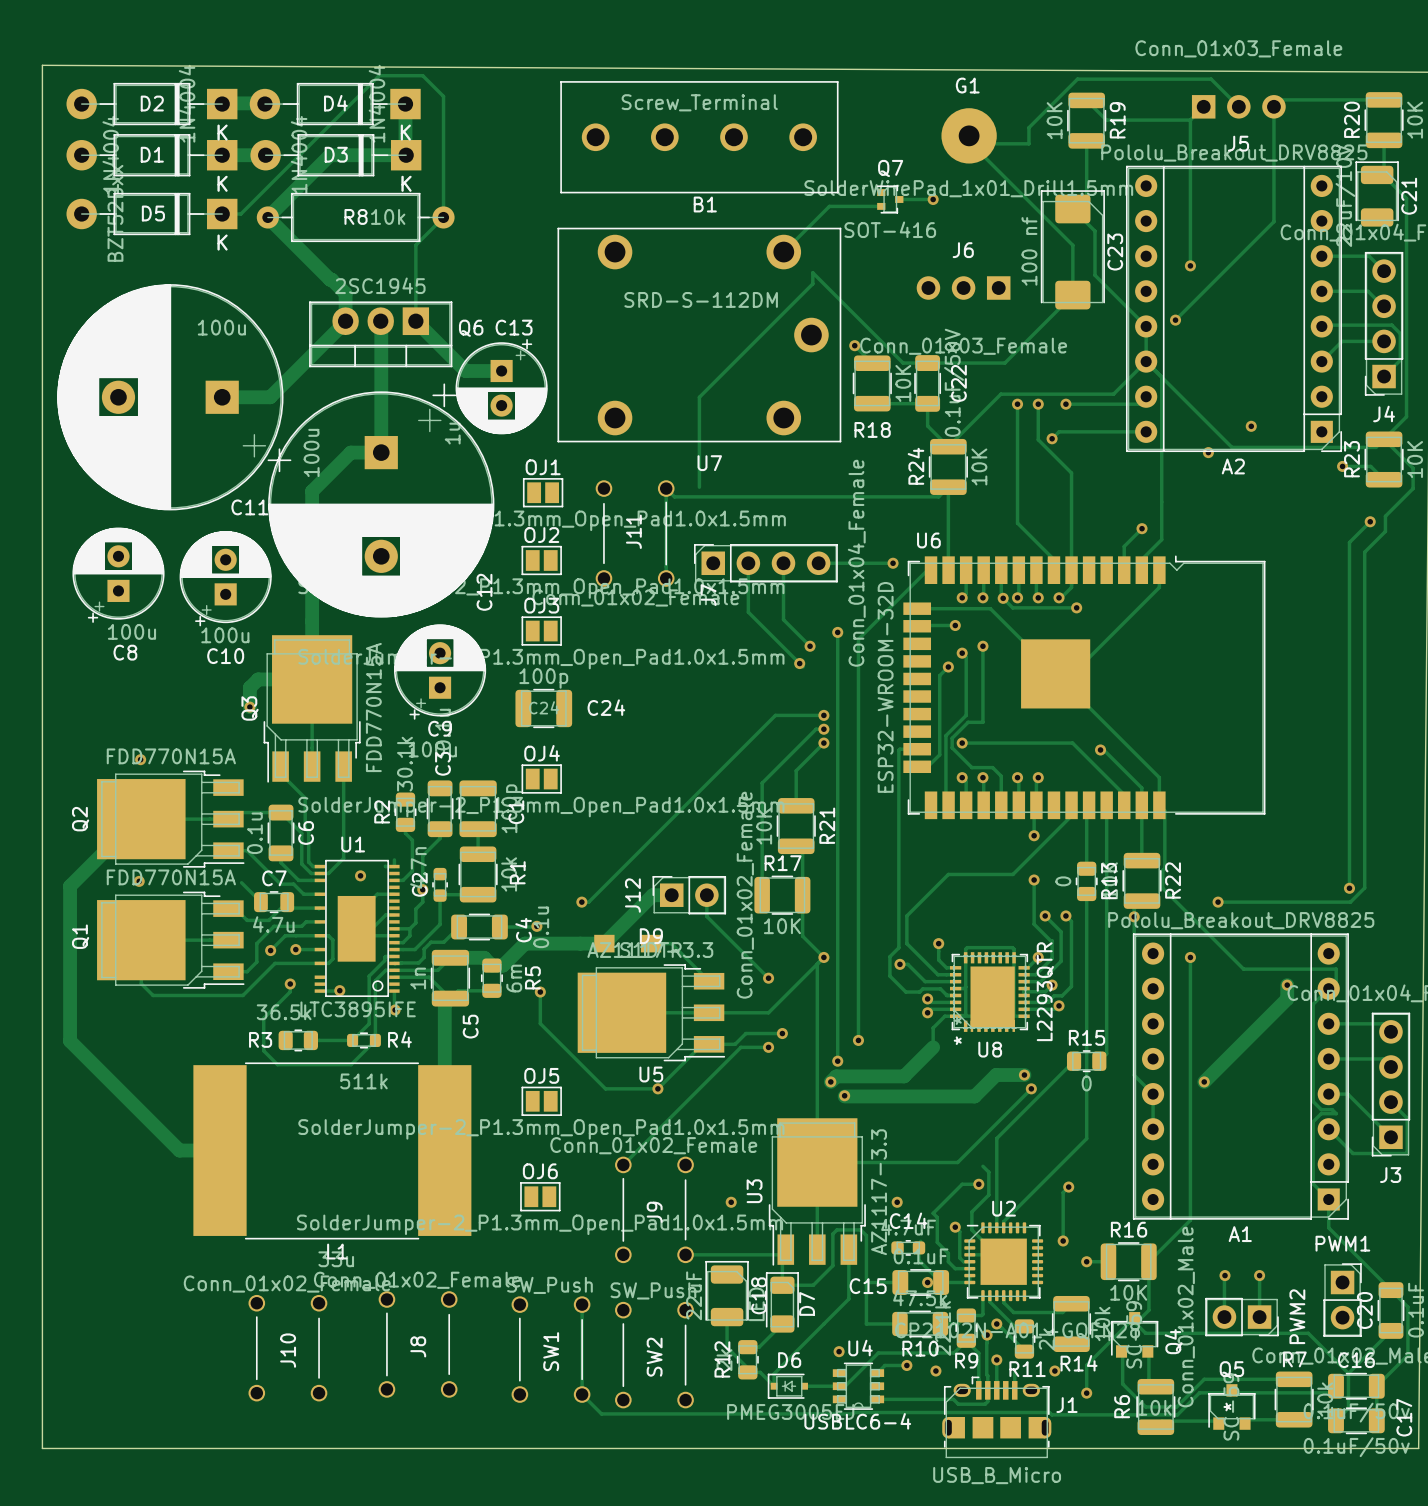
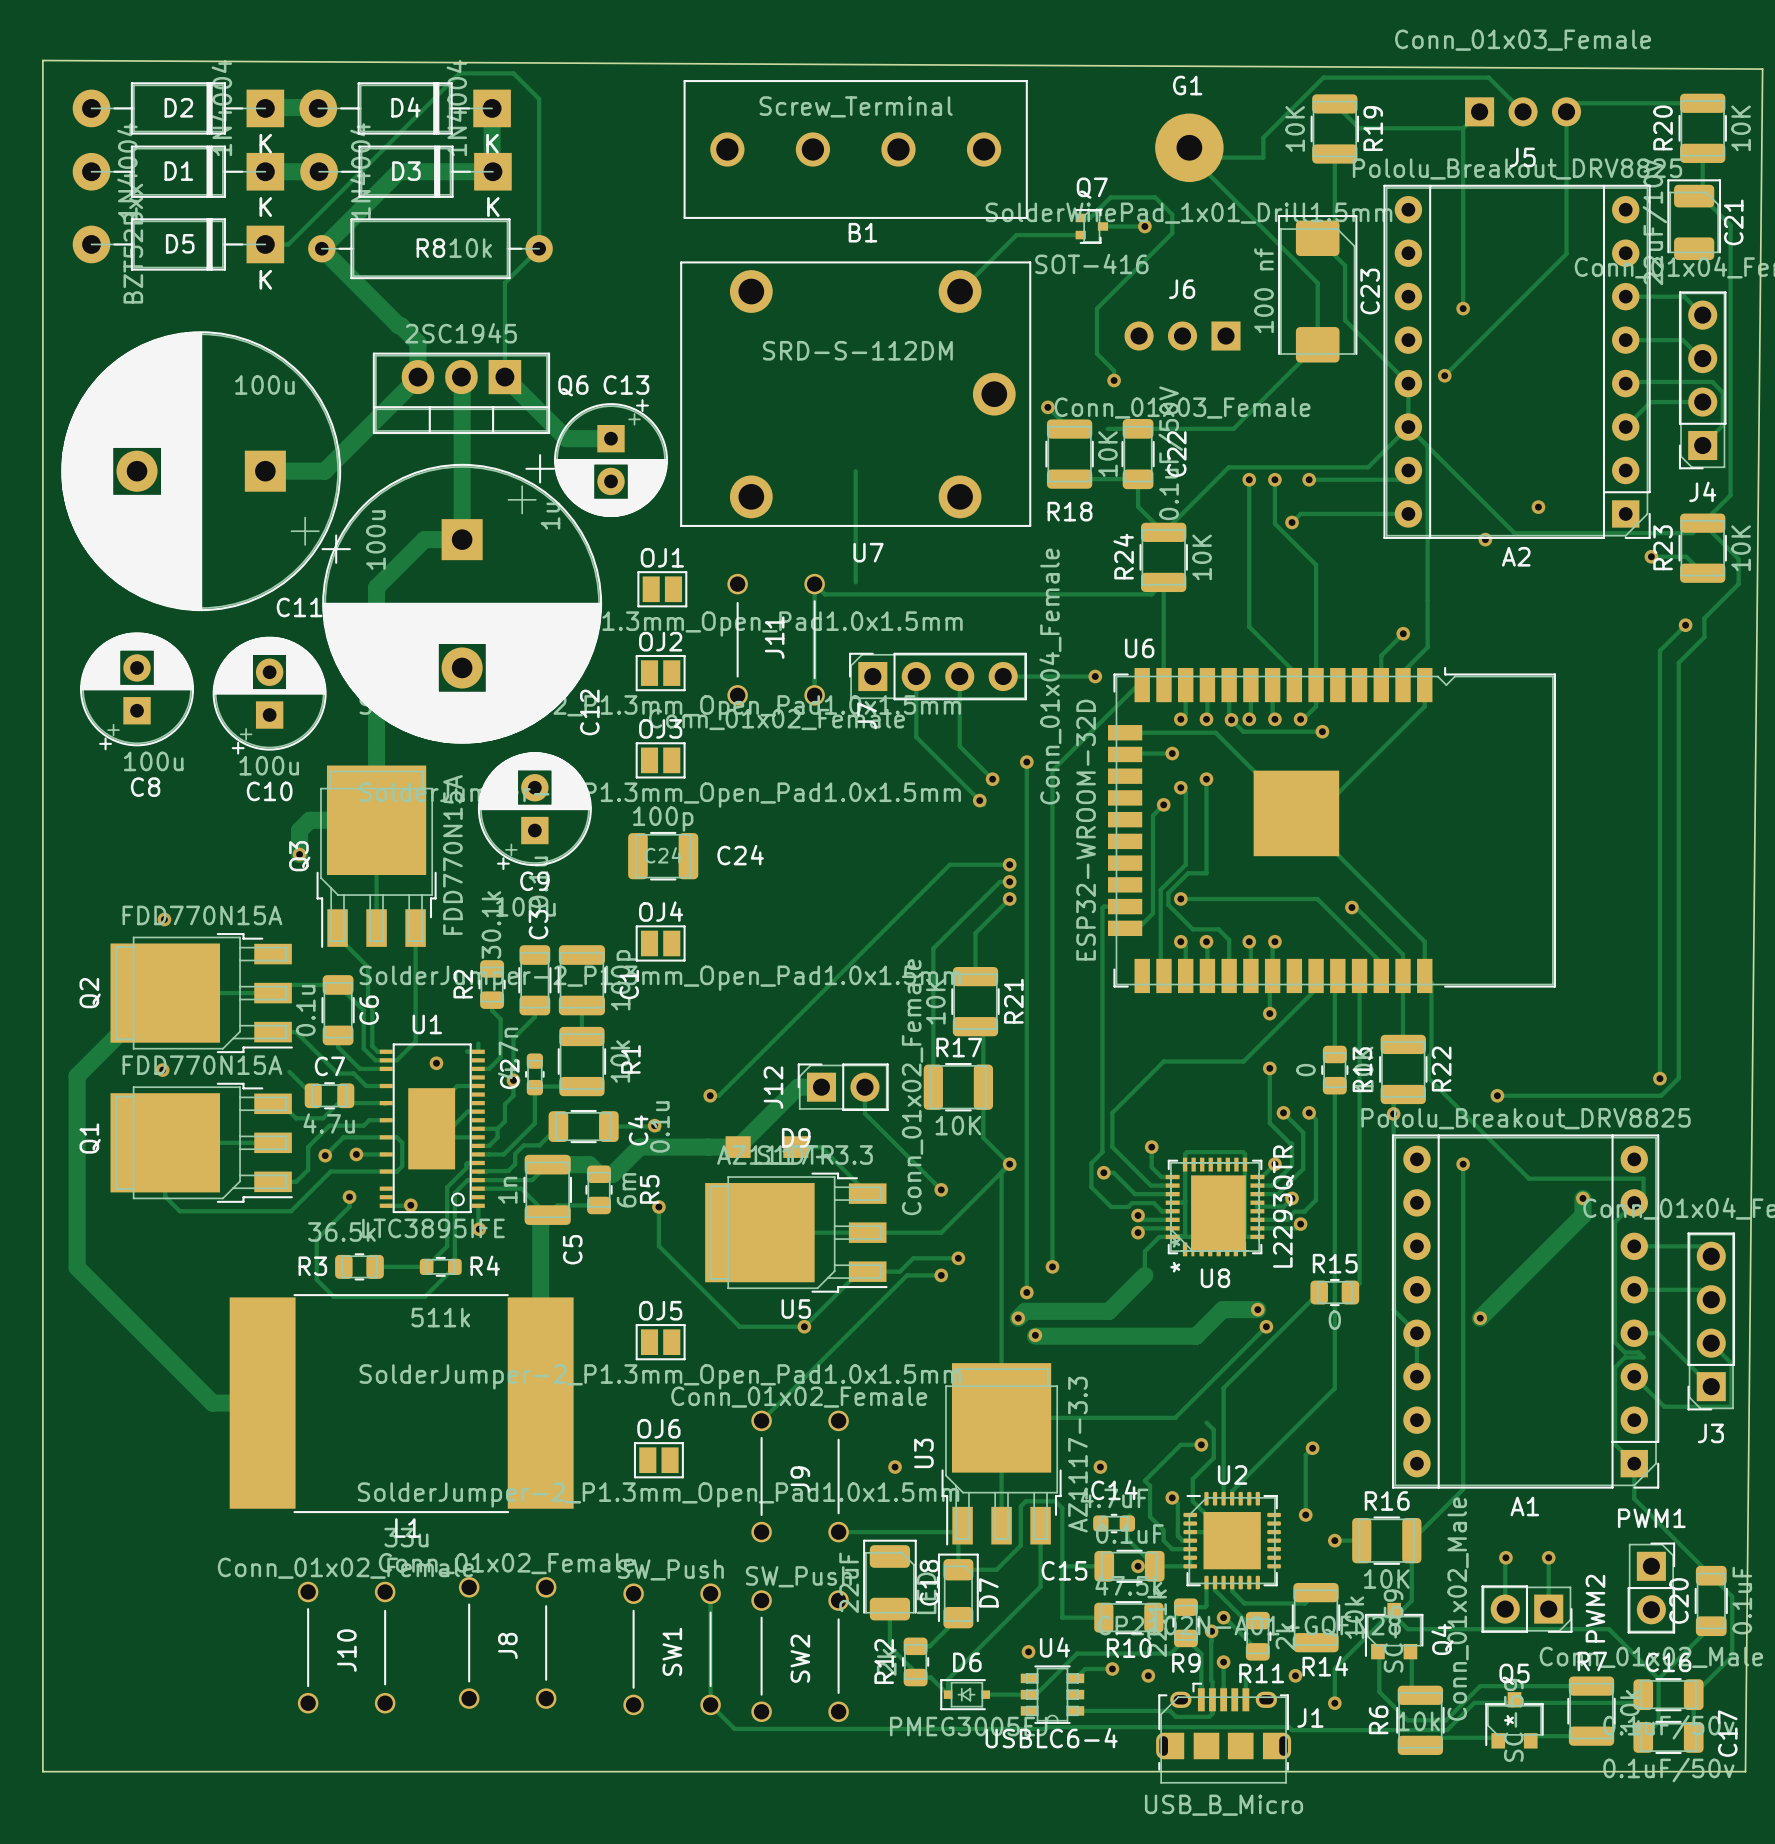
track: none -> (1080, 217) (1090, 217) (1110, 197) (1155, 197) (1172, 214) (1172, 233) (1096, 308) (1096, 353) (1114, 370) (1114, 380)
via: none -> (1114, 380)
track: (903, 363) (812, 272) (812, 283) (699, 397) -> none

